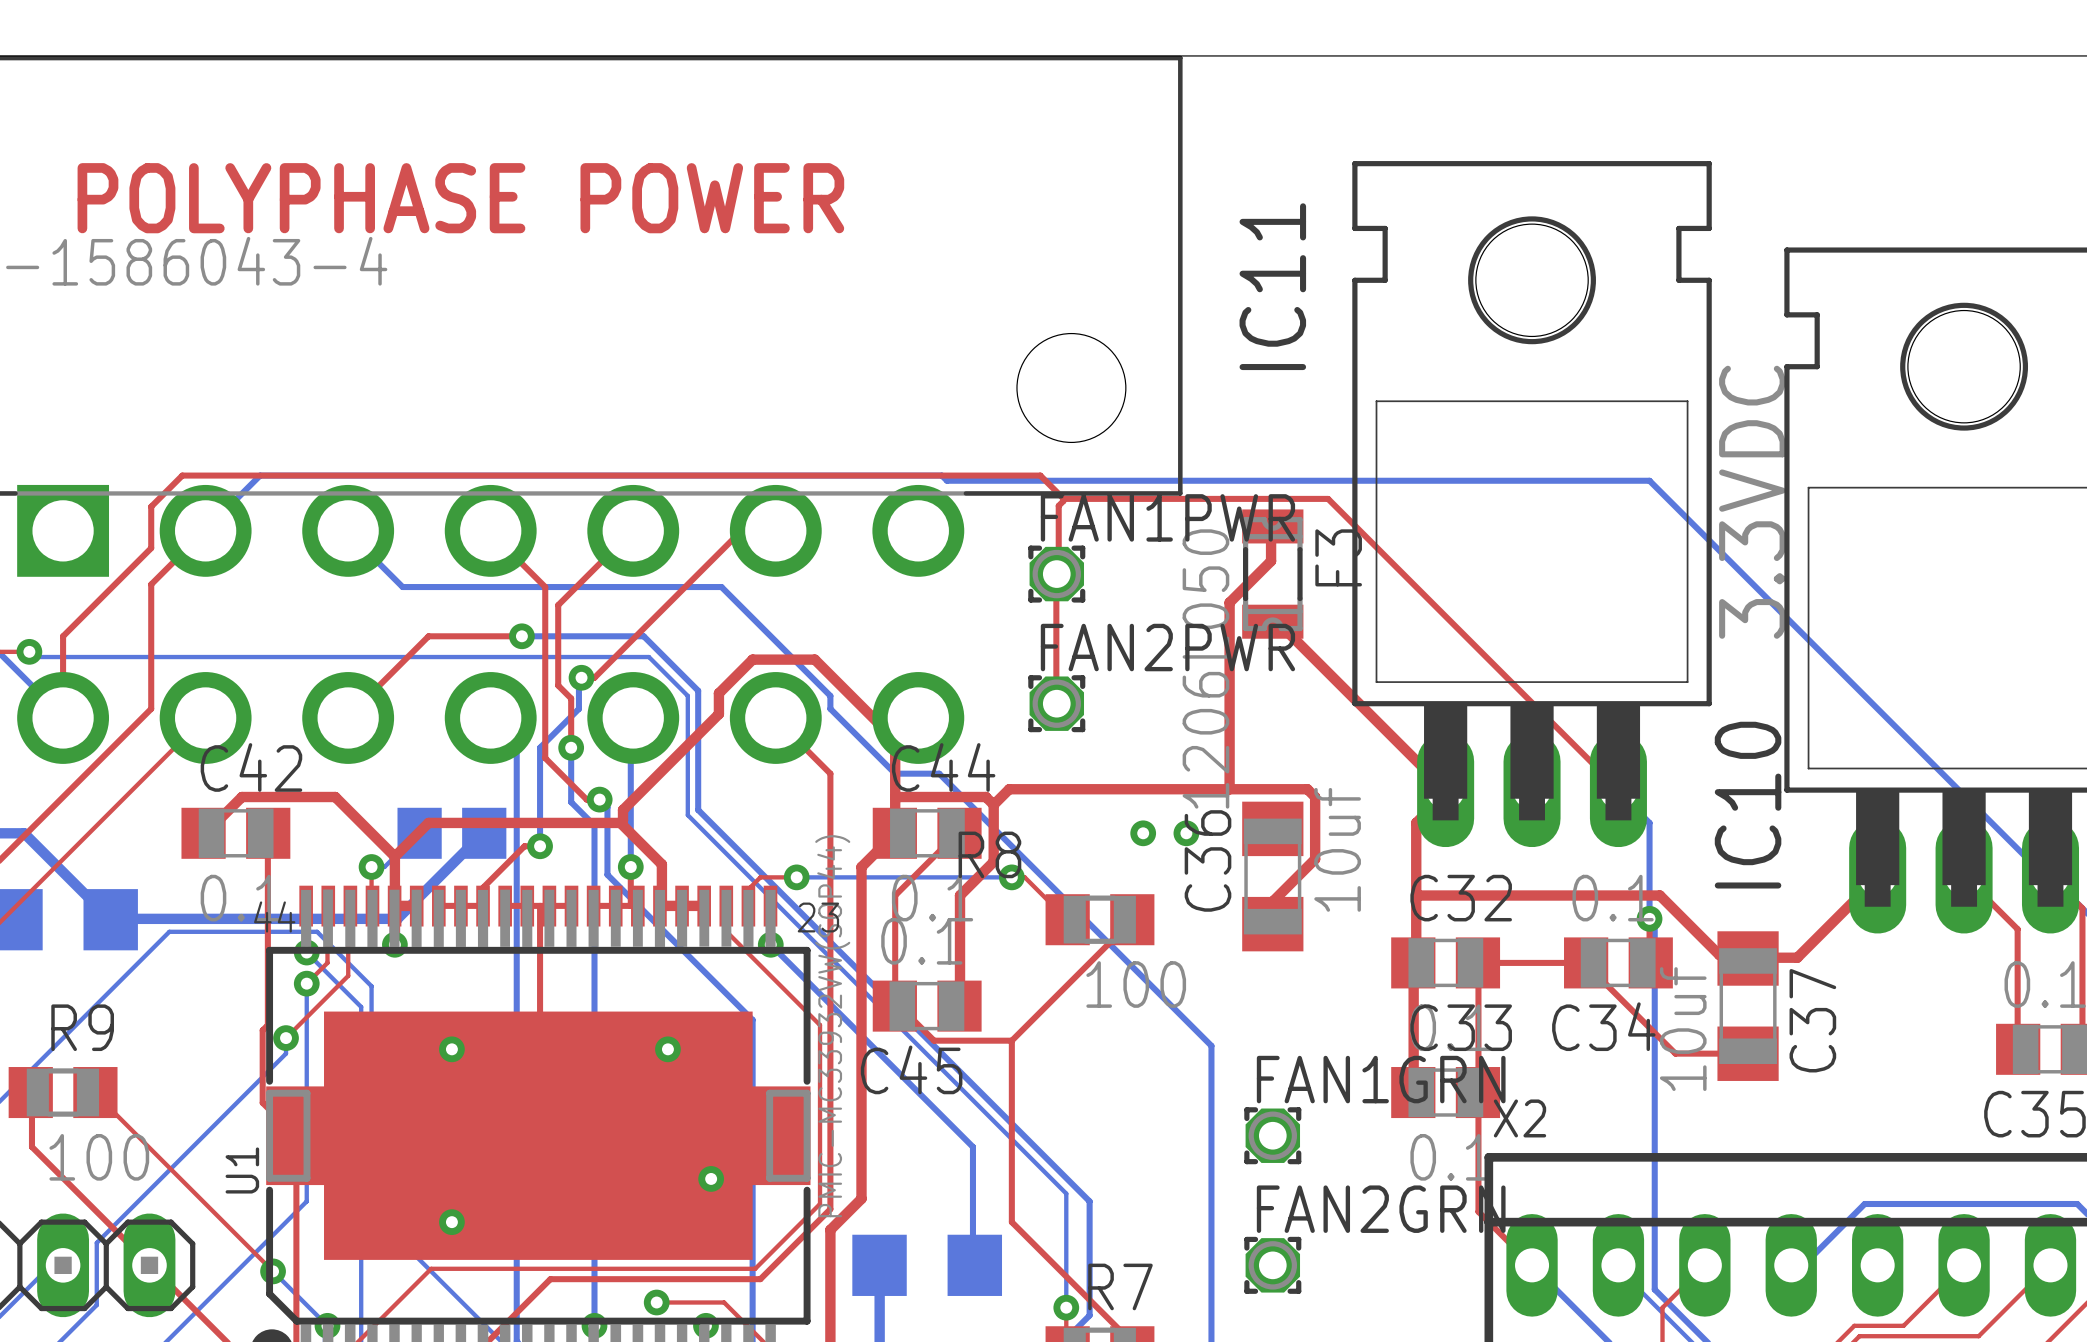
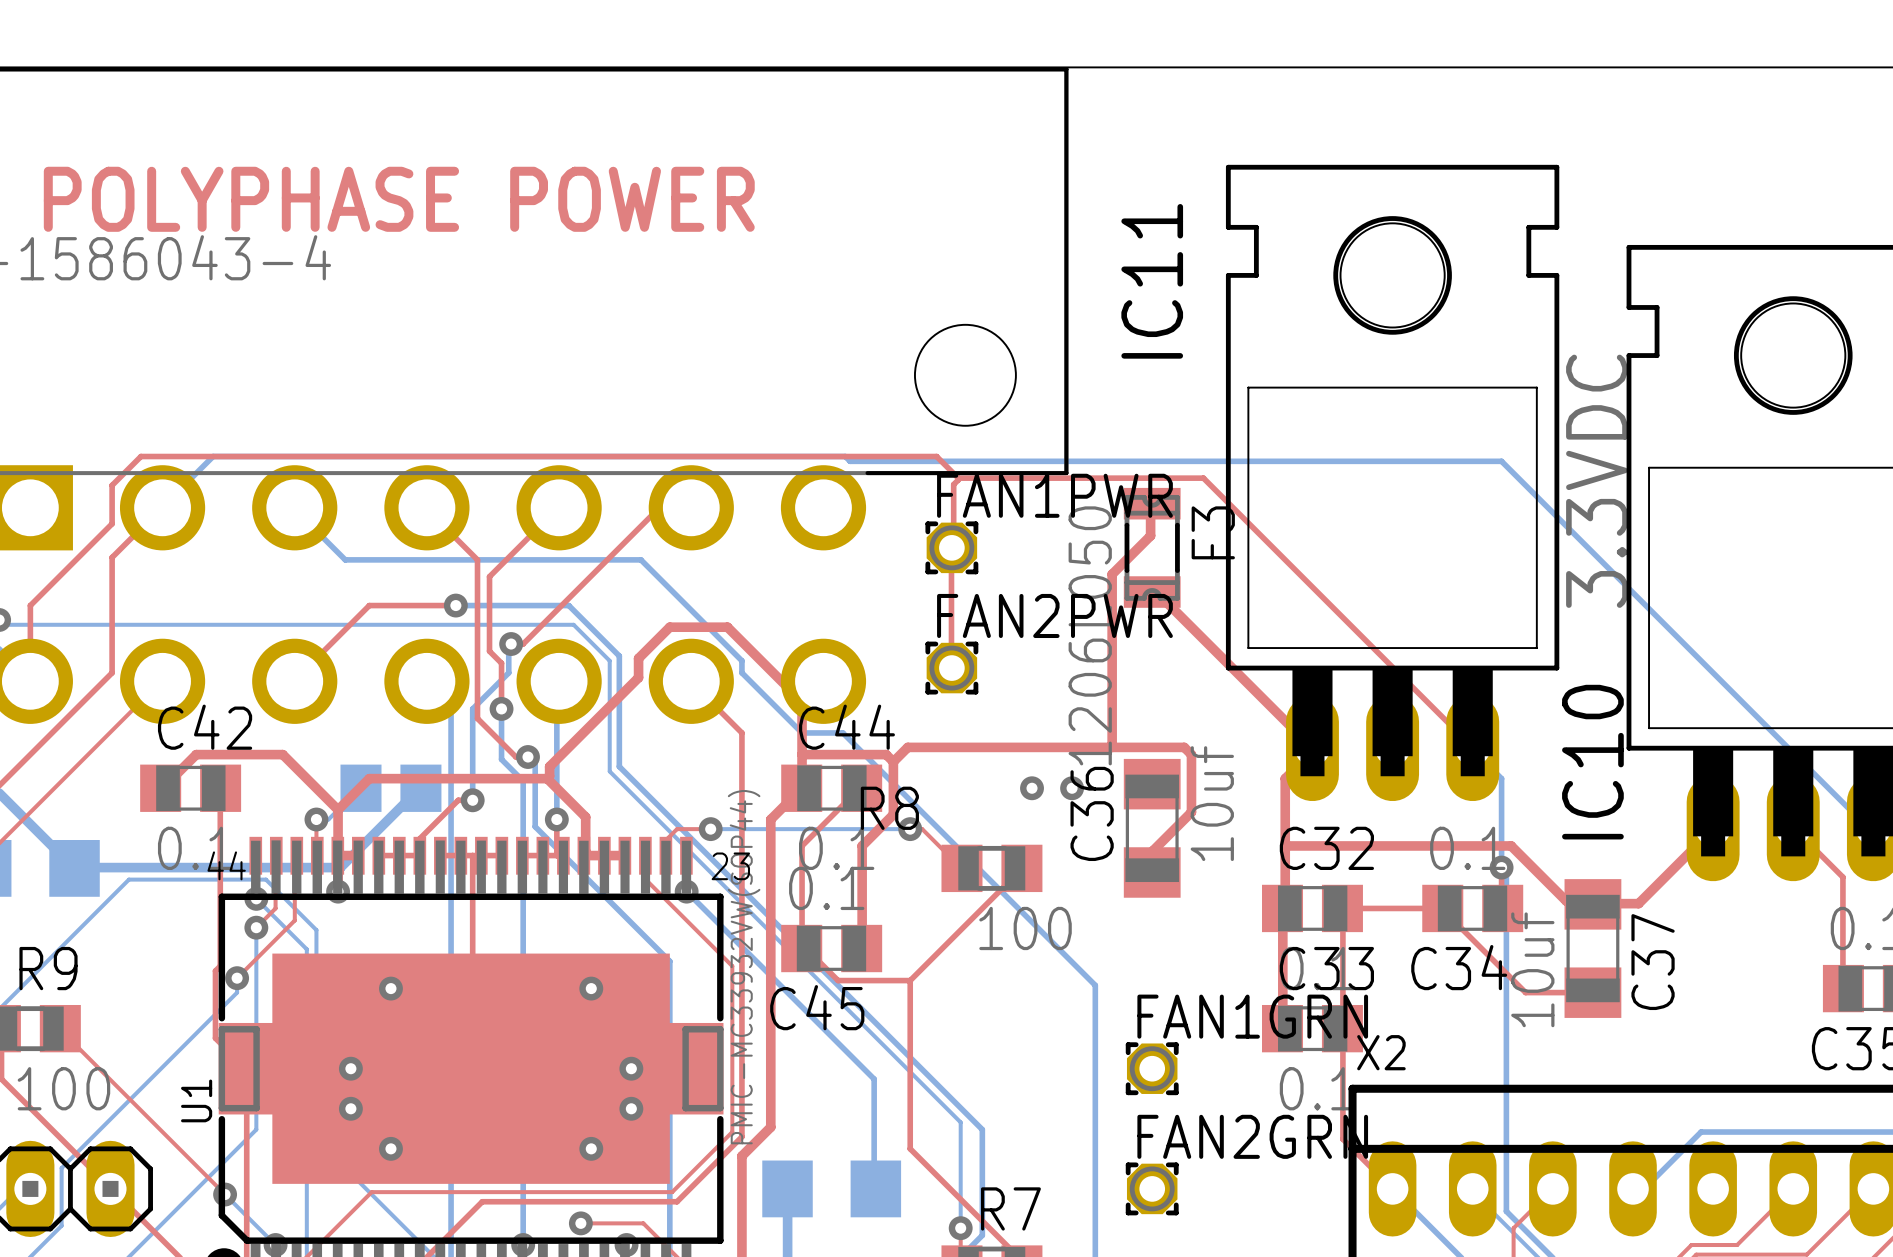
via: none -> (350, 1068)
via: none -> (631, 1068)
via: none -> (350, 1108)
via: none -> (591, 1148)

